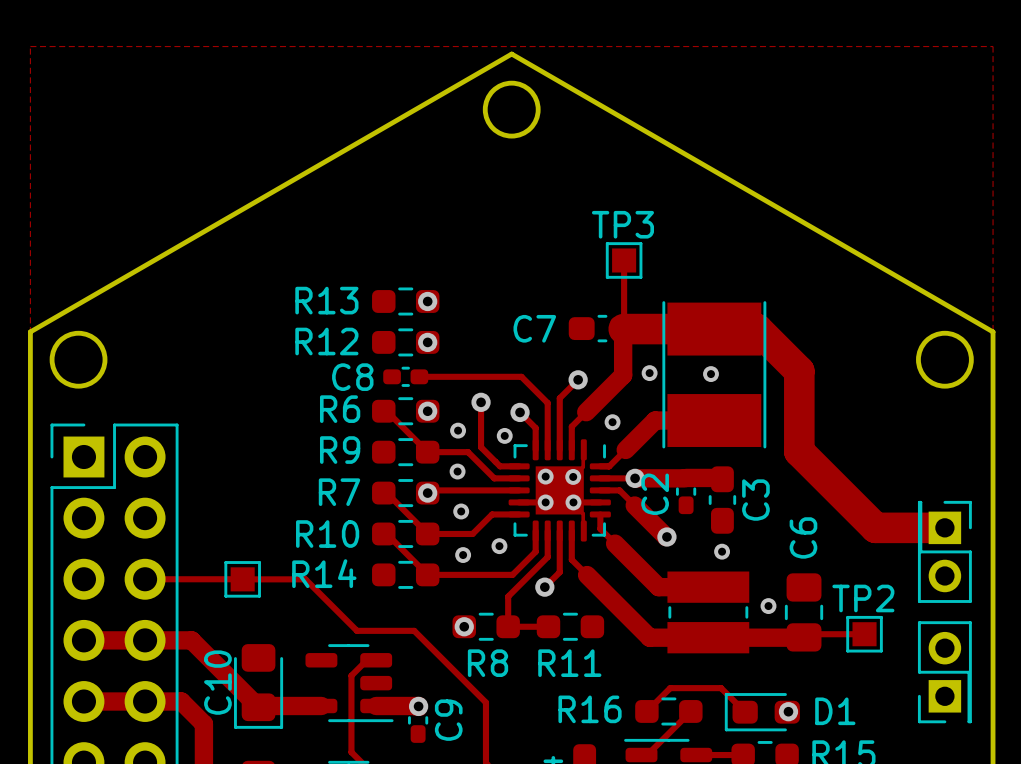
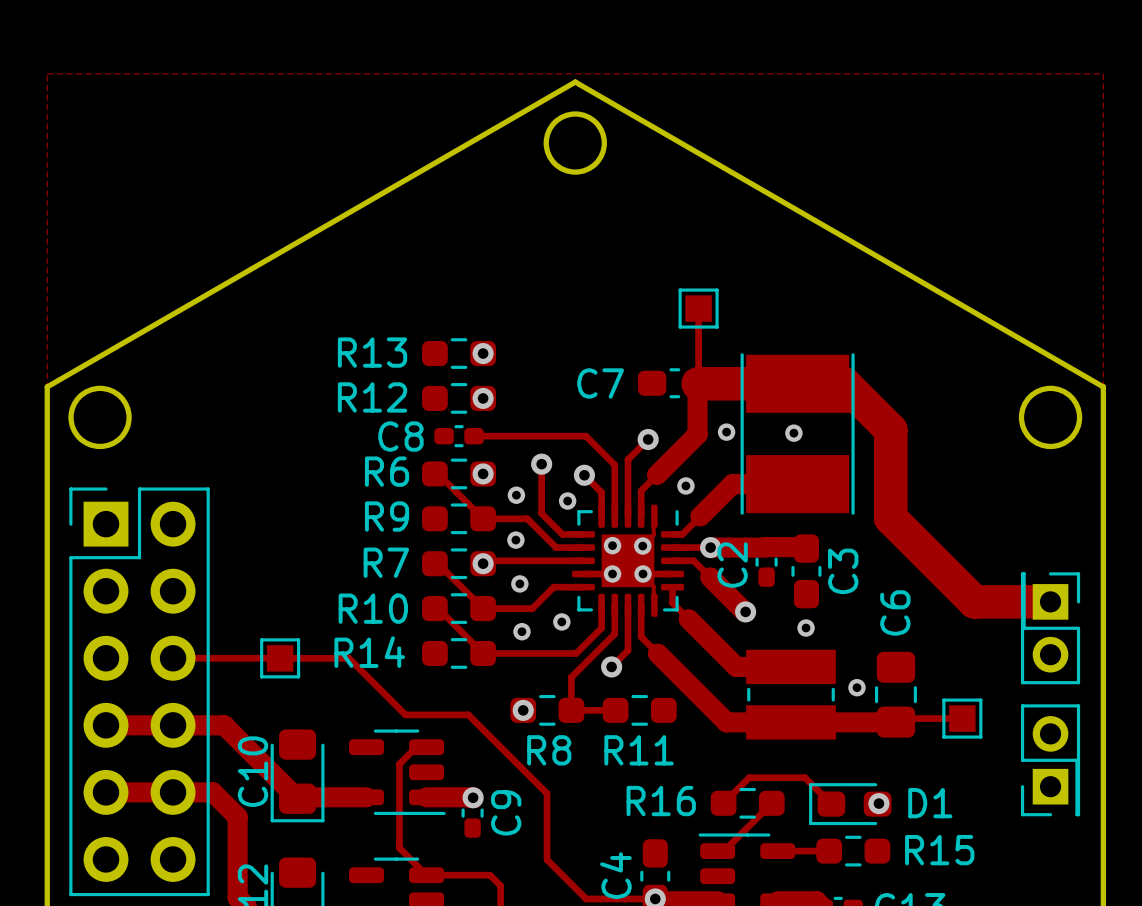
TP3 name: TP3 (622, 224) -> none
TP2 name: TP2 (863, 598) -> none

